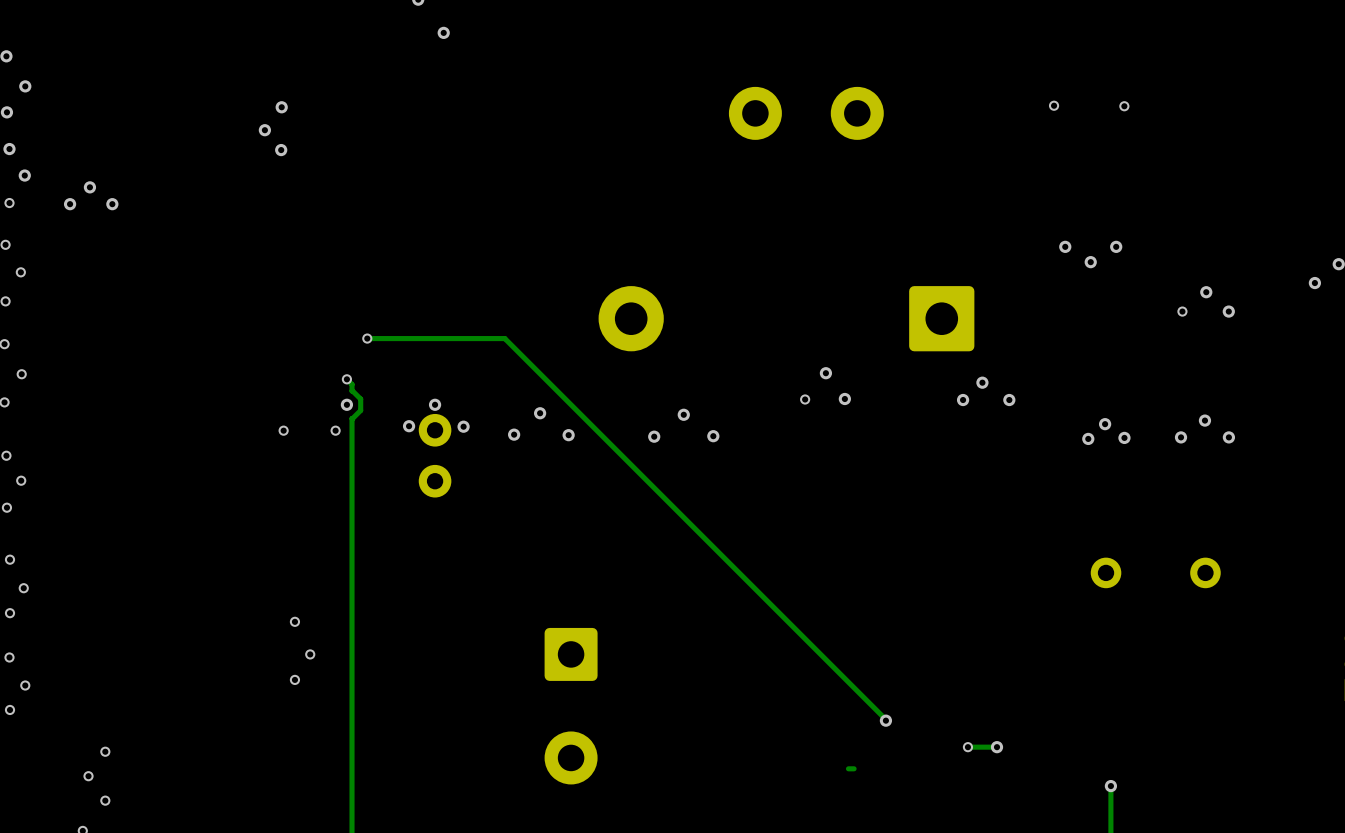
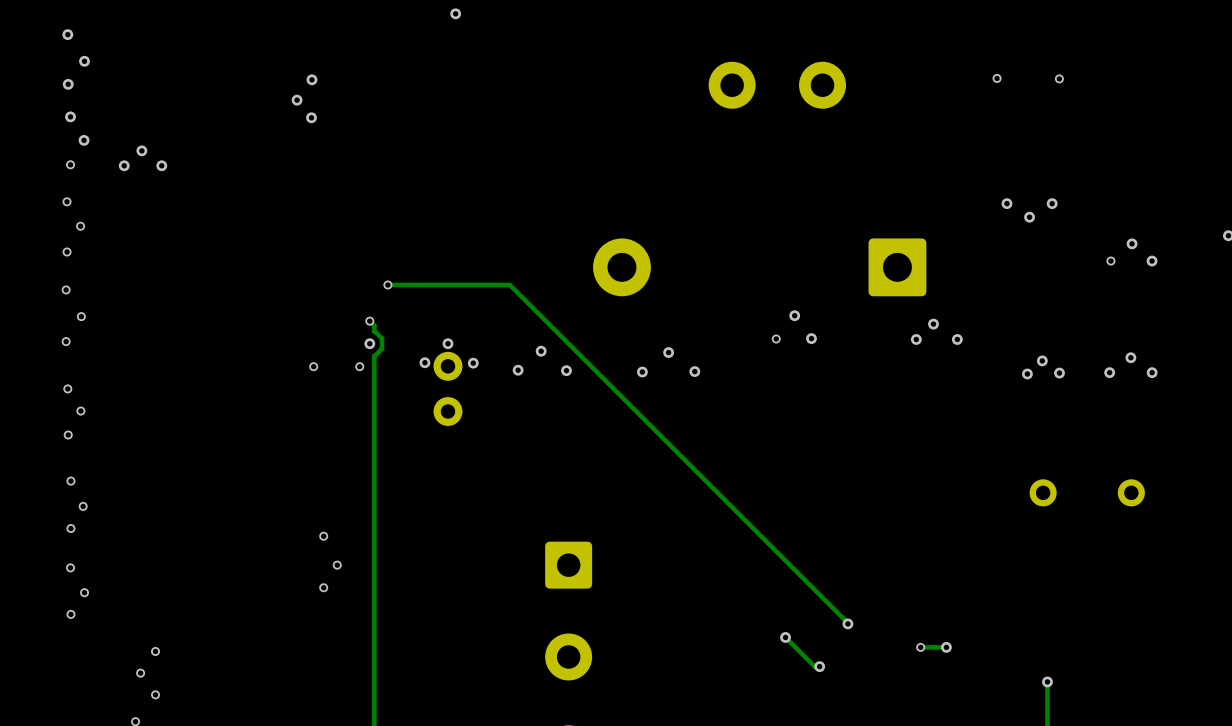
track: none -> (785, 637) (814, 666)
via: none -> (785, 637)
via: none -> (819, 666)

